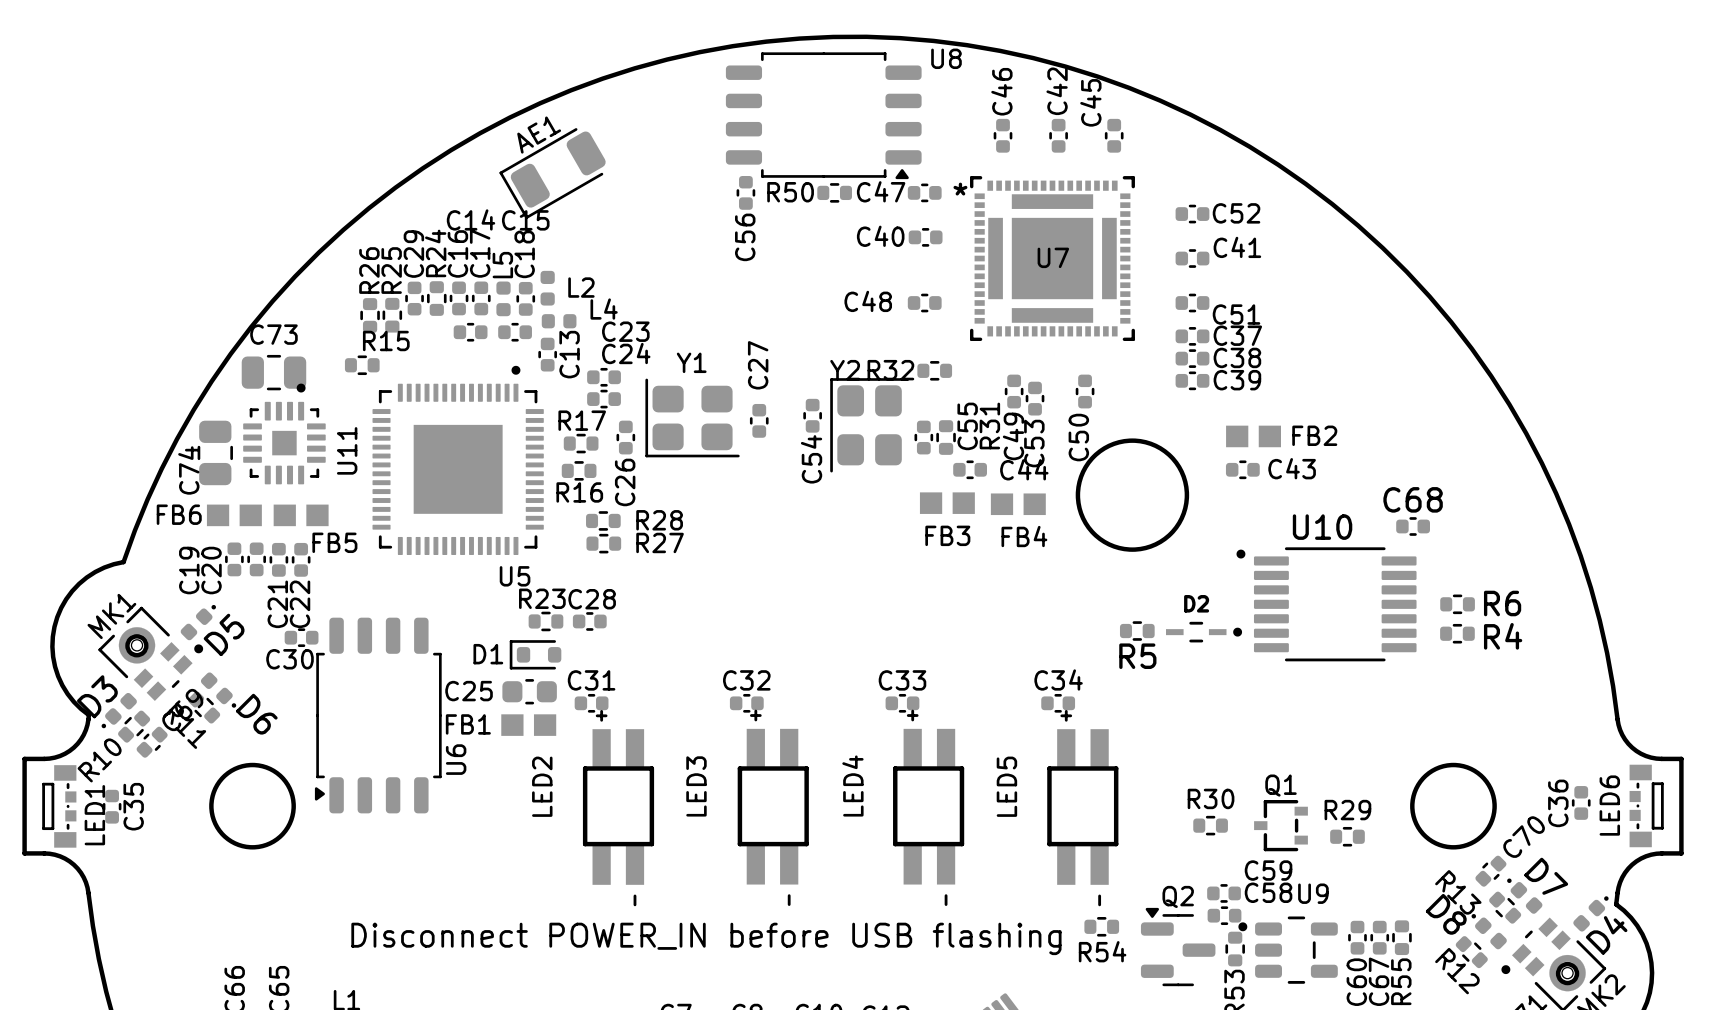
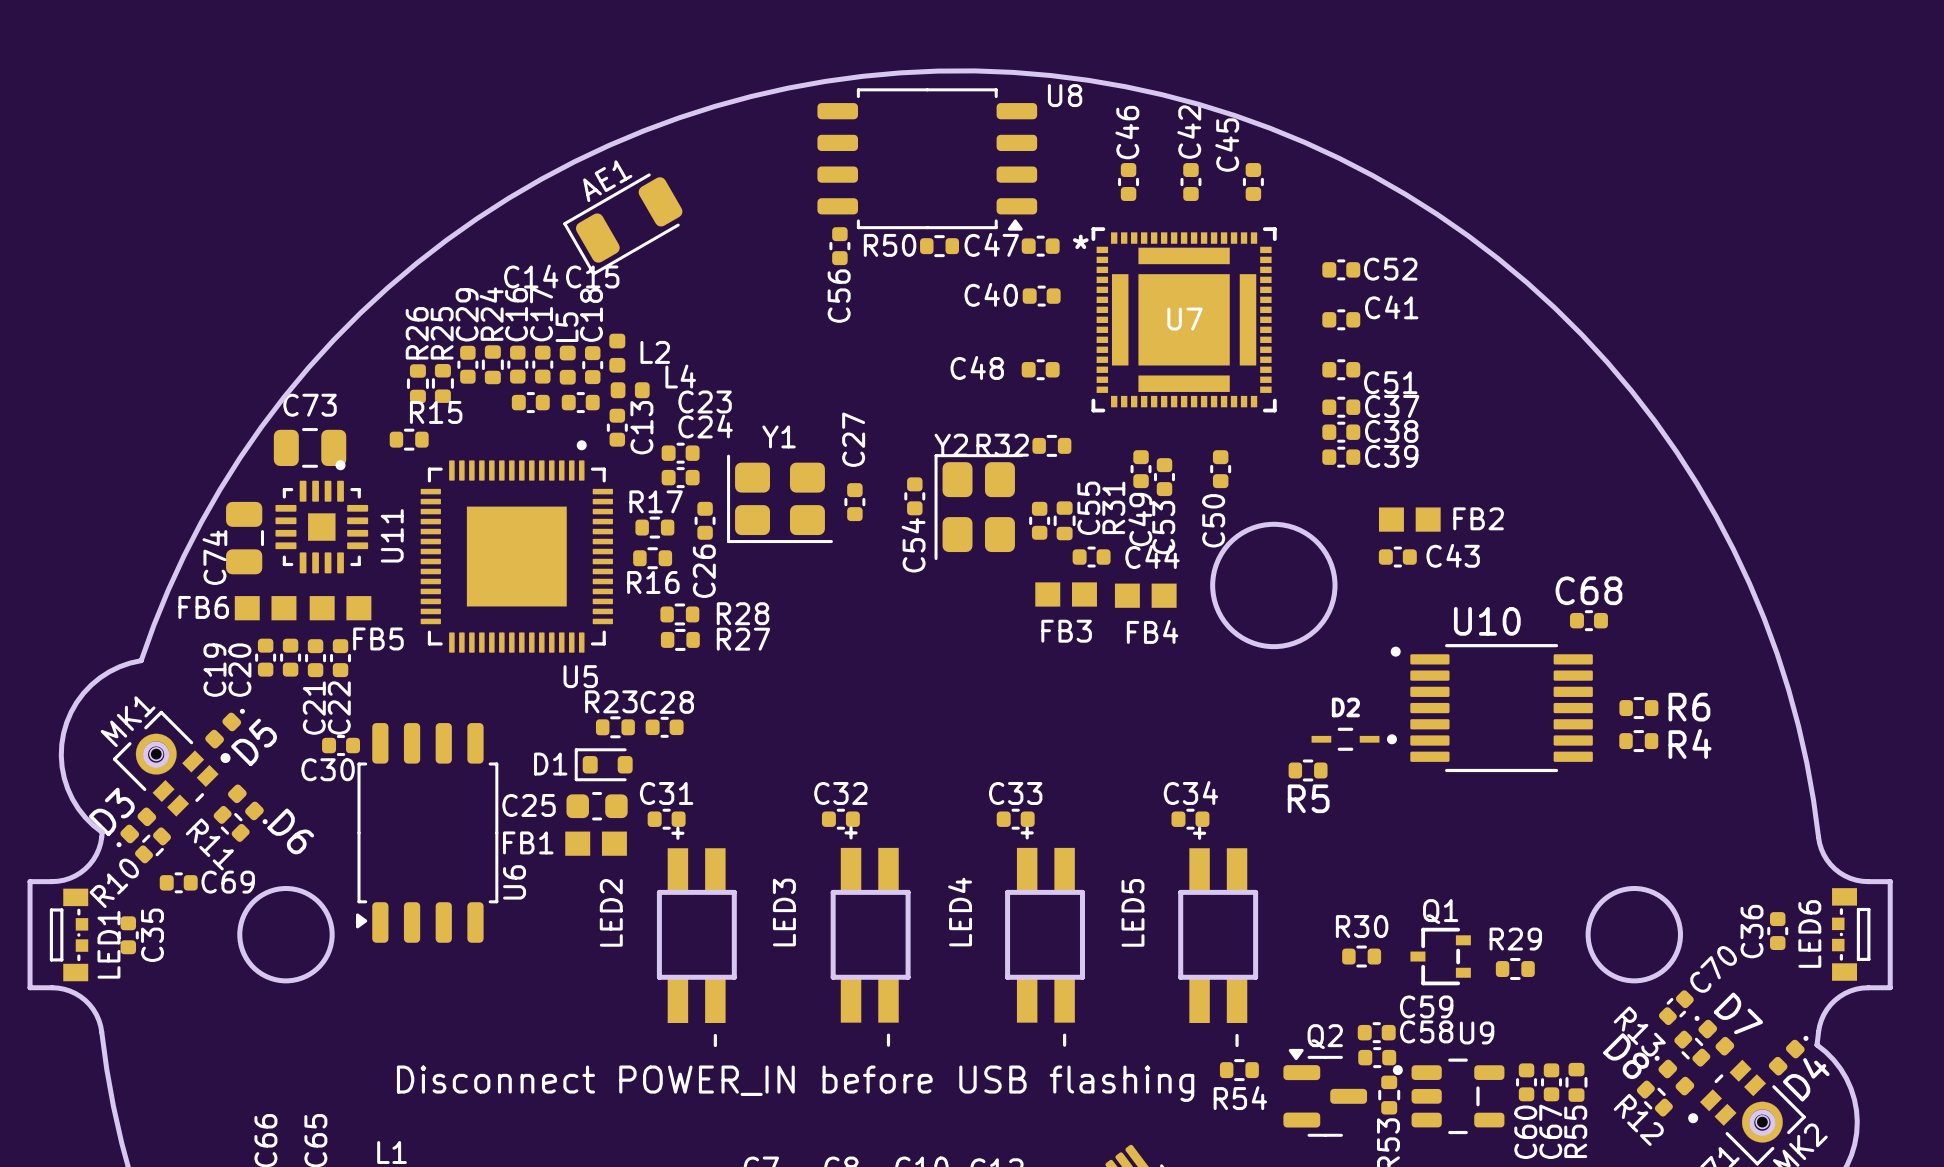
R5 position: (1137, 631) -> (1308, 770)
C69 rotation: 0° (152, 742) -> 45° clockwise (178, 882)

